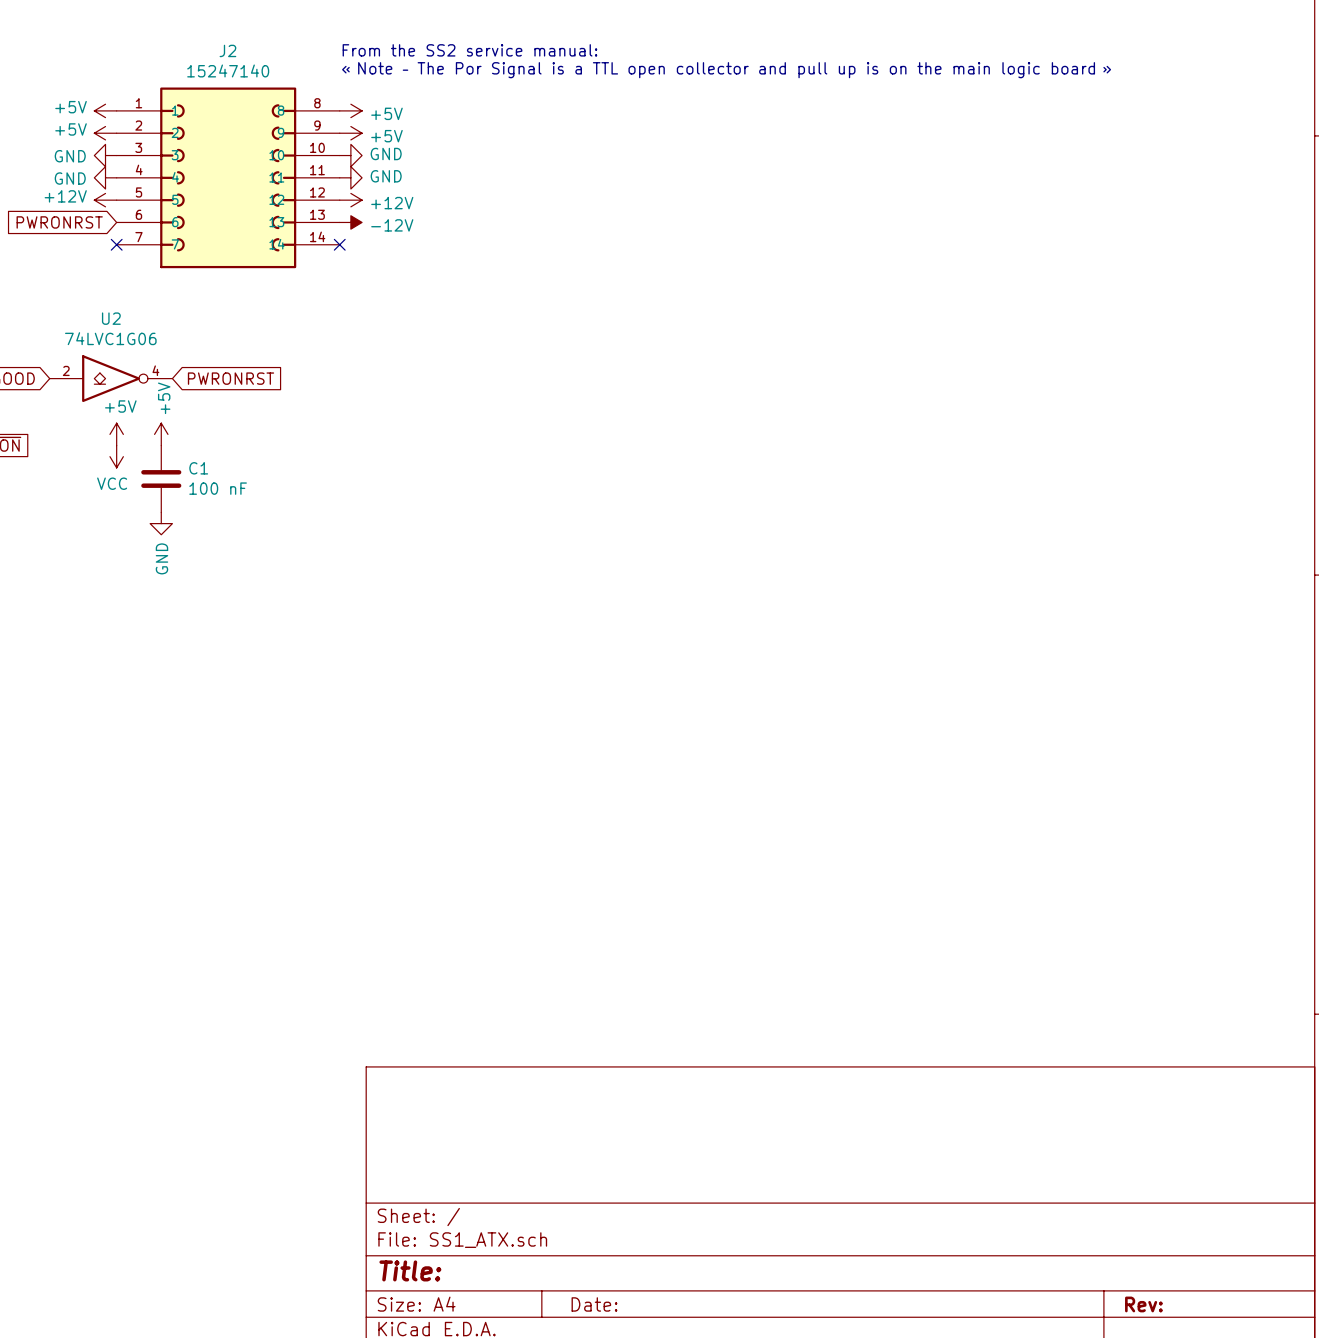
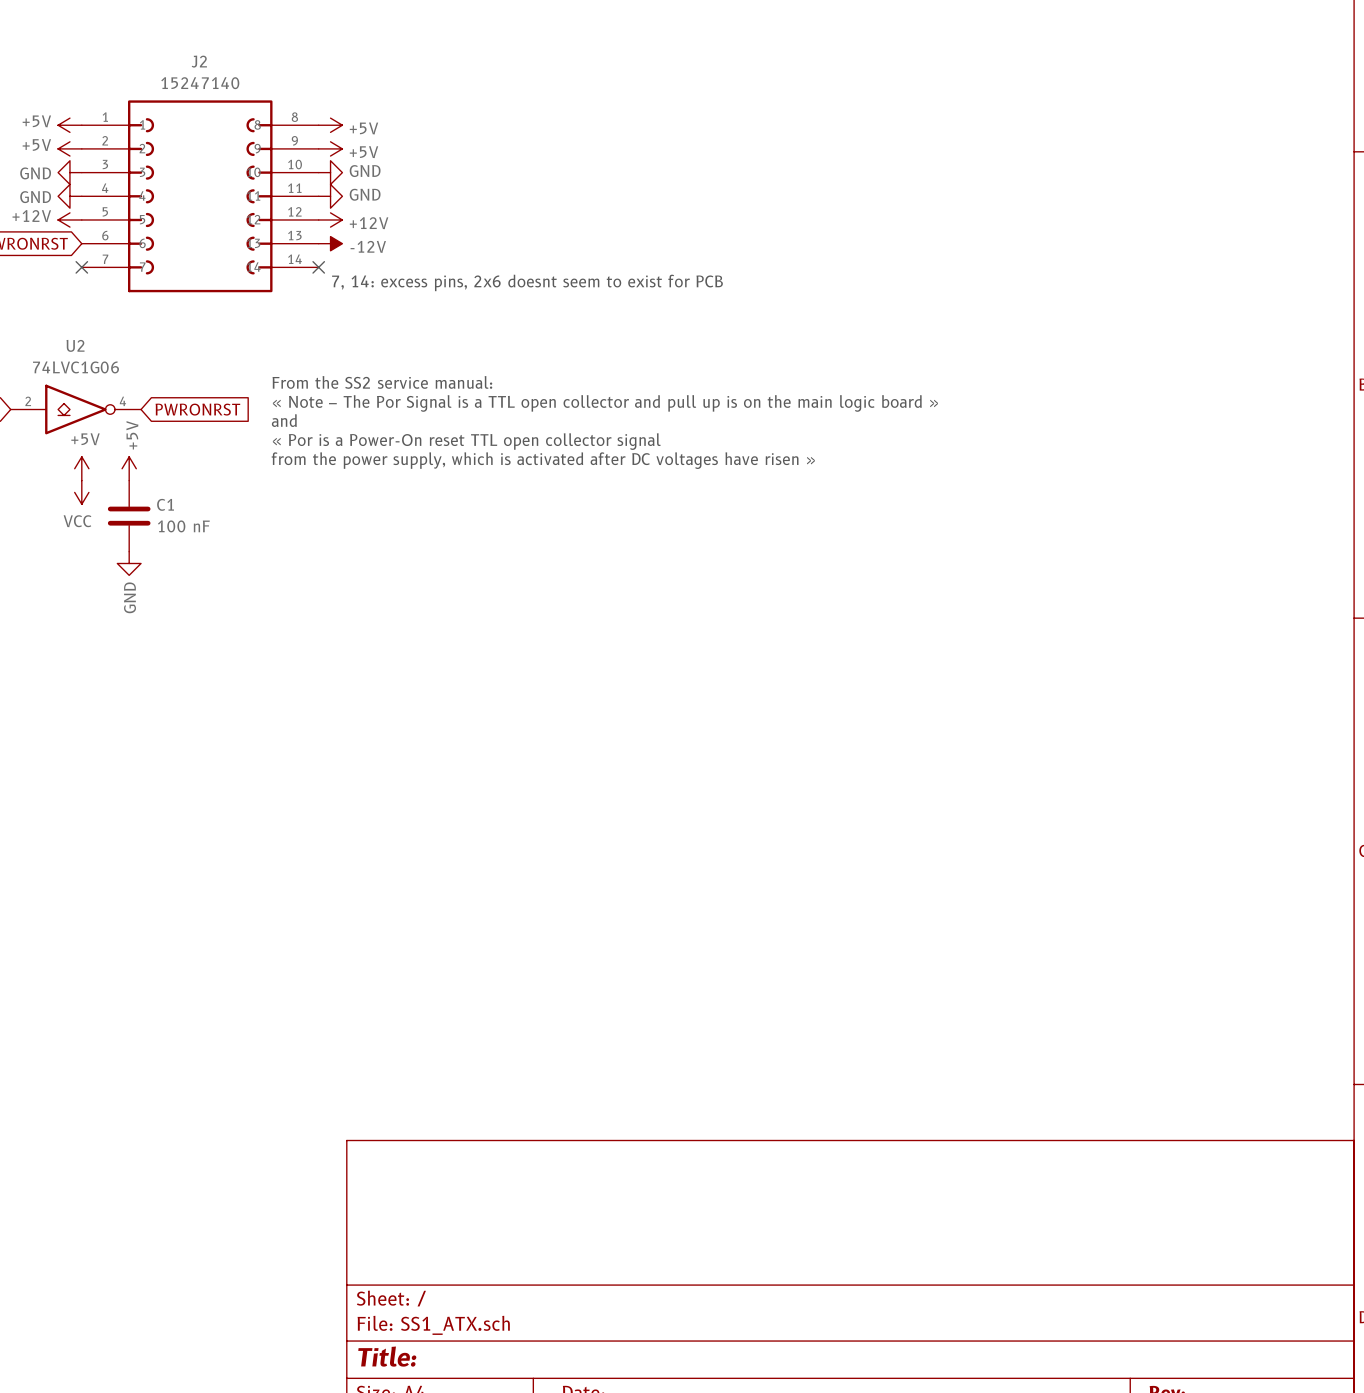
text: From the SS2 service manual: (469, 50) -> none
text: « Note – The Por Signal is a TTL open collector and pull up is on the main logic board » (726, 70) -> none
text: none -> 7, 14: excess pins, 2x6 doesnt seem to exist for PCB (527, 282)
text: none -> From the SS2 service manual: (382, 382)
text: none -> « Note – The Por Signal is a TTL open collector and pull up is on the main logic board » (605, 403)
text: none -> and (284, 420)
text: none -> « Por is a Power-On reset TTL open collector signal (466, 441)
text: none -> from the power supply, which is activated after DC voltages have risen » (543, 460)

